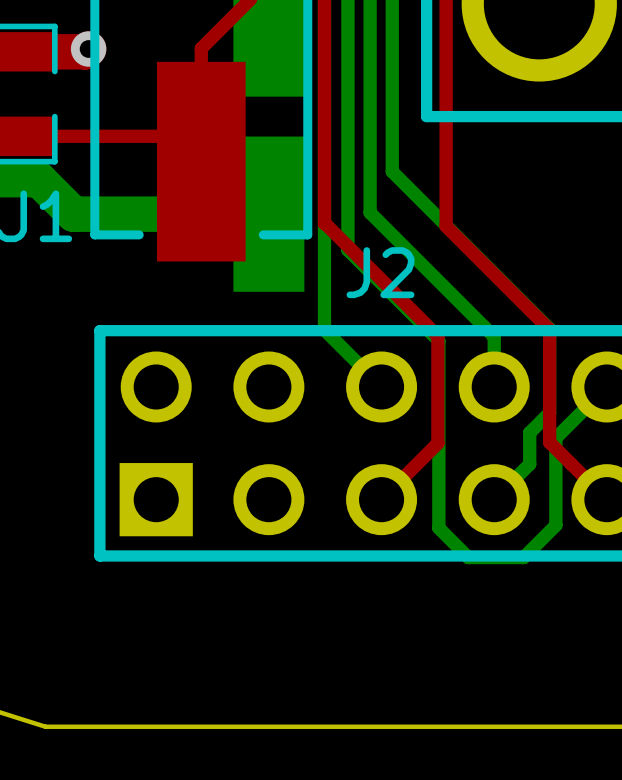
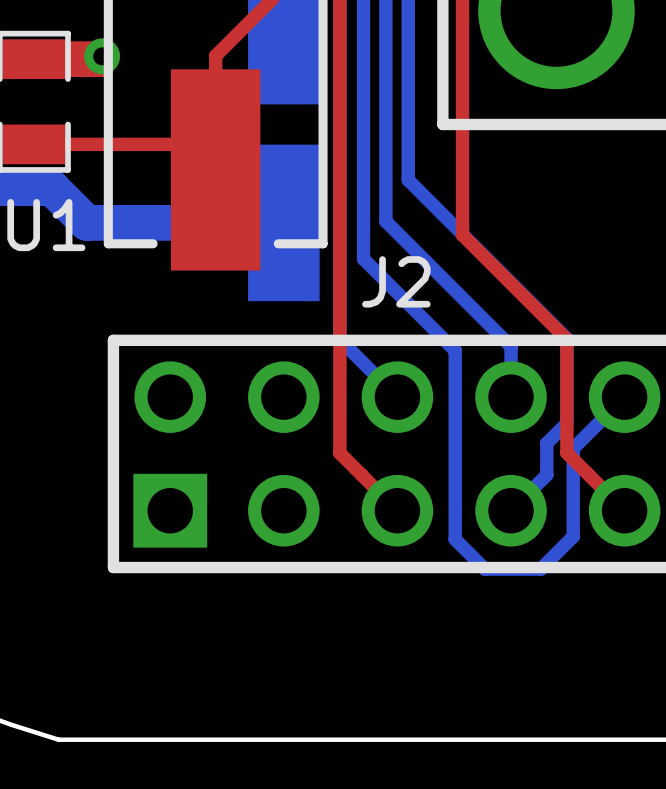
top track: (325, 223) (437, 336) (437, 443) (381, 499) -> (339, 232) (339, 453) (397, 510)

